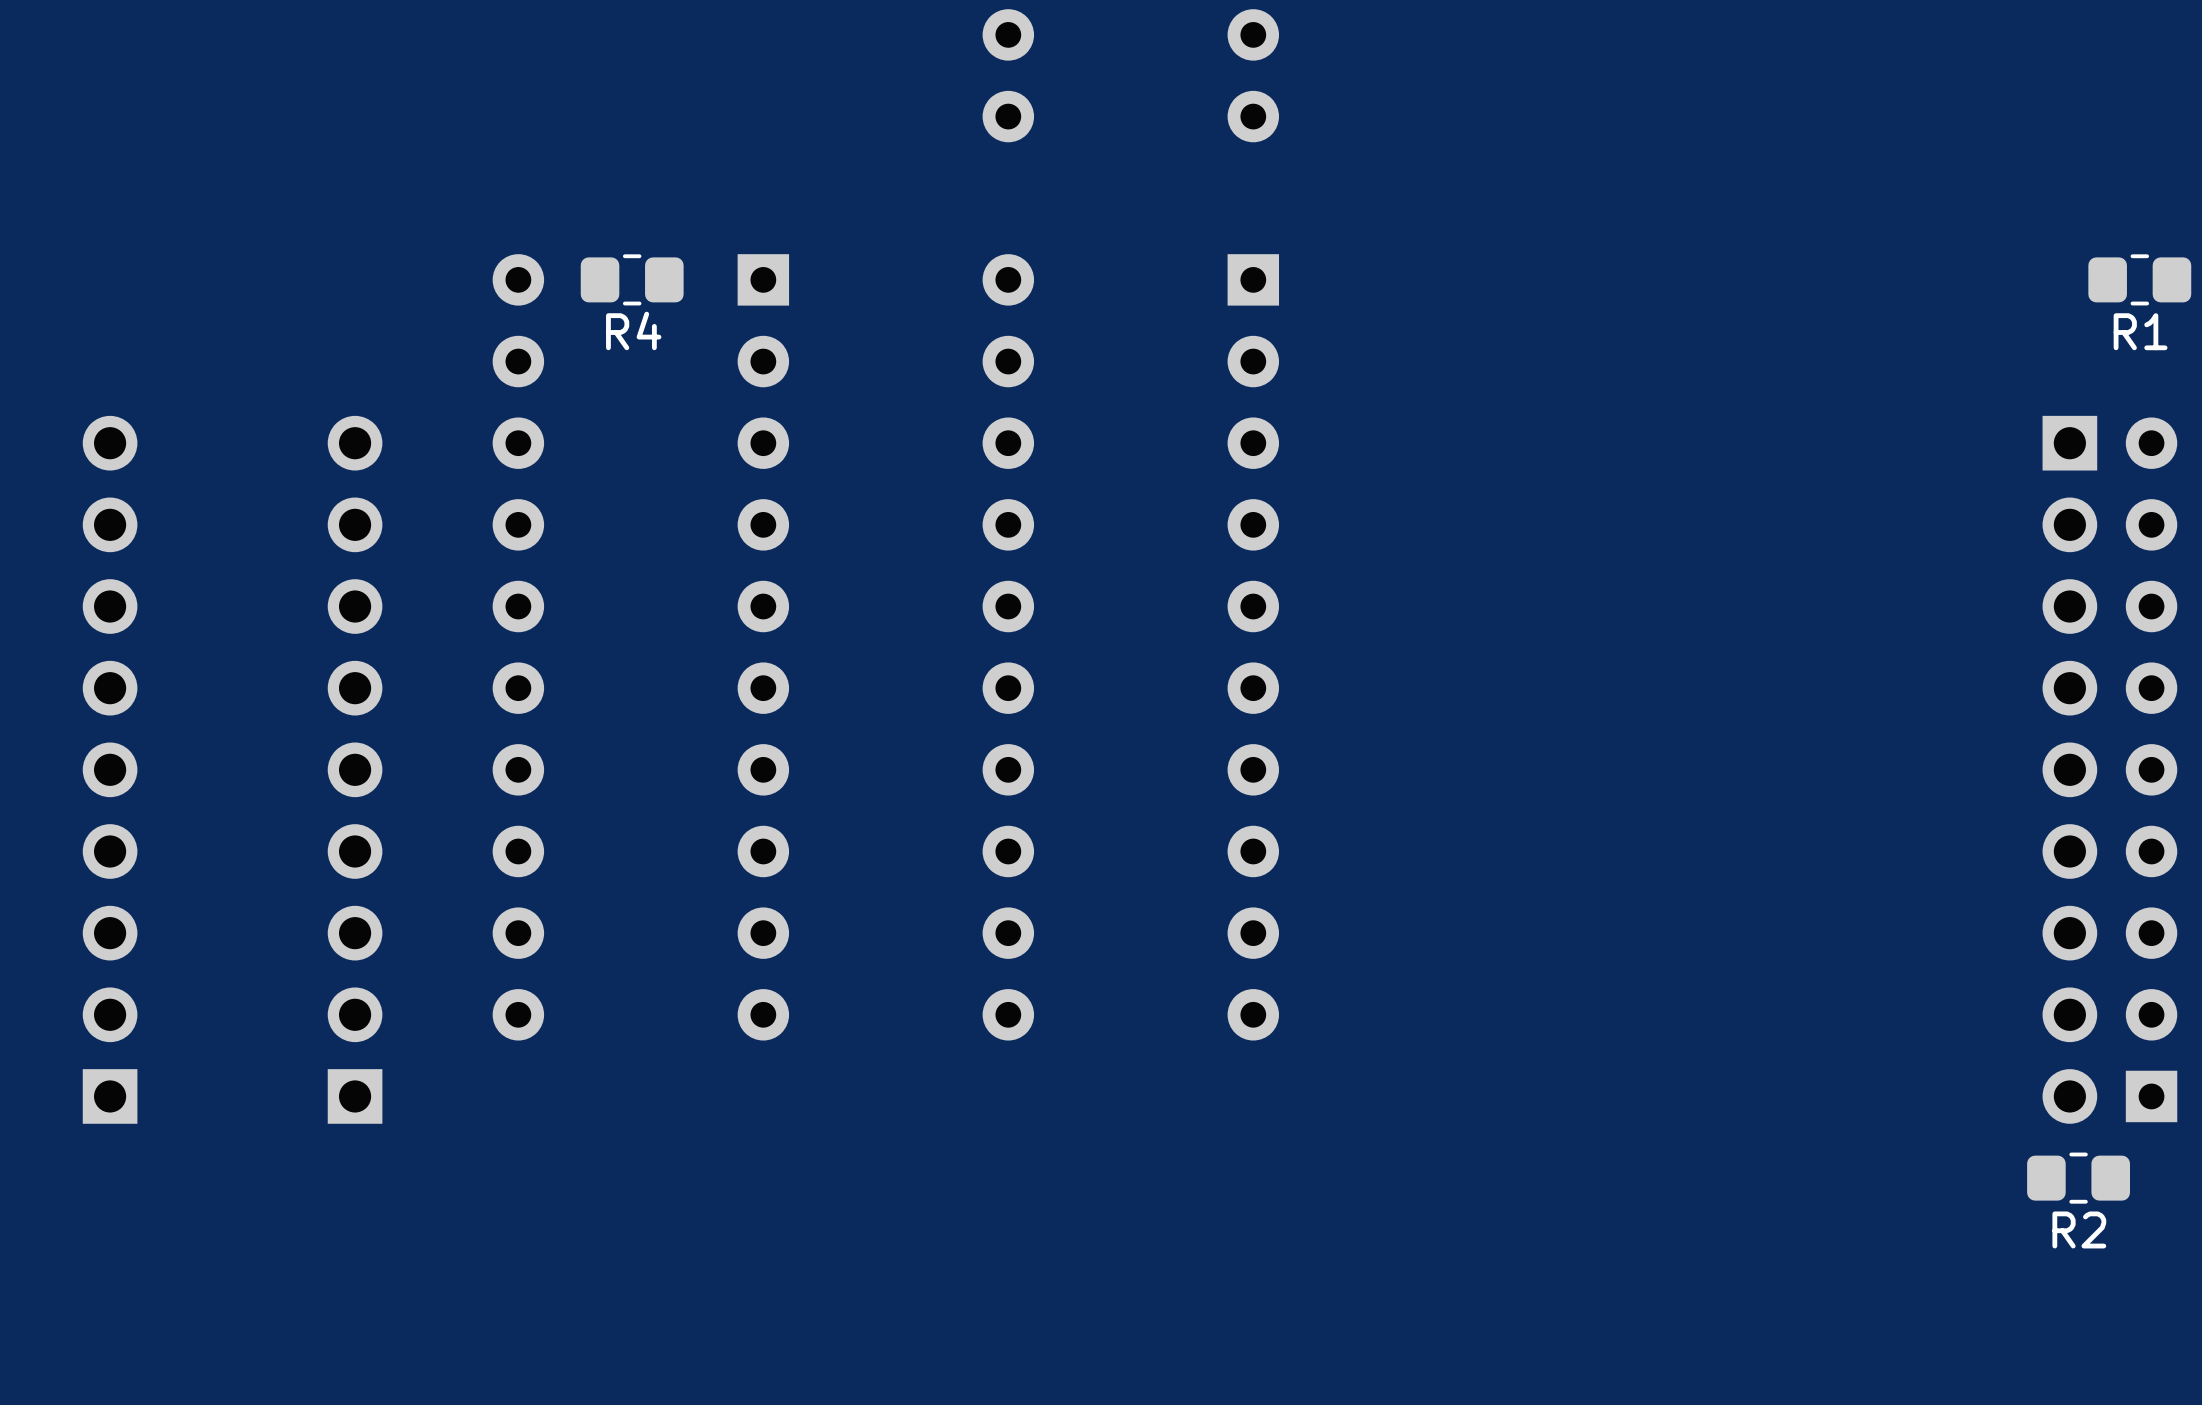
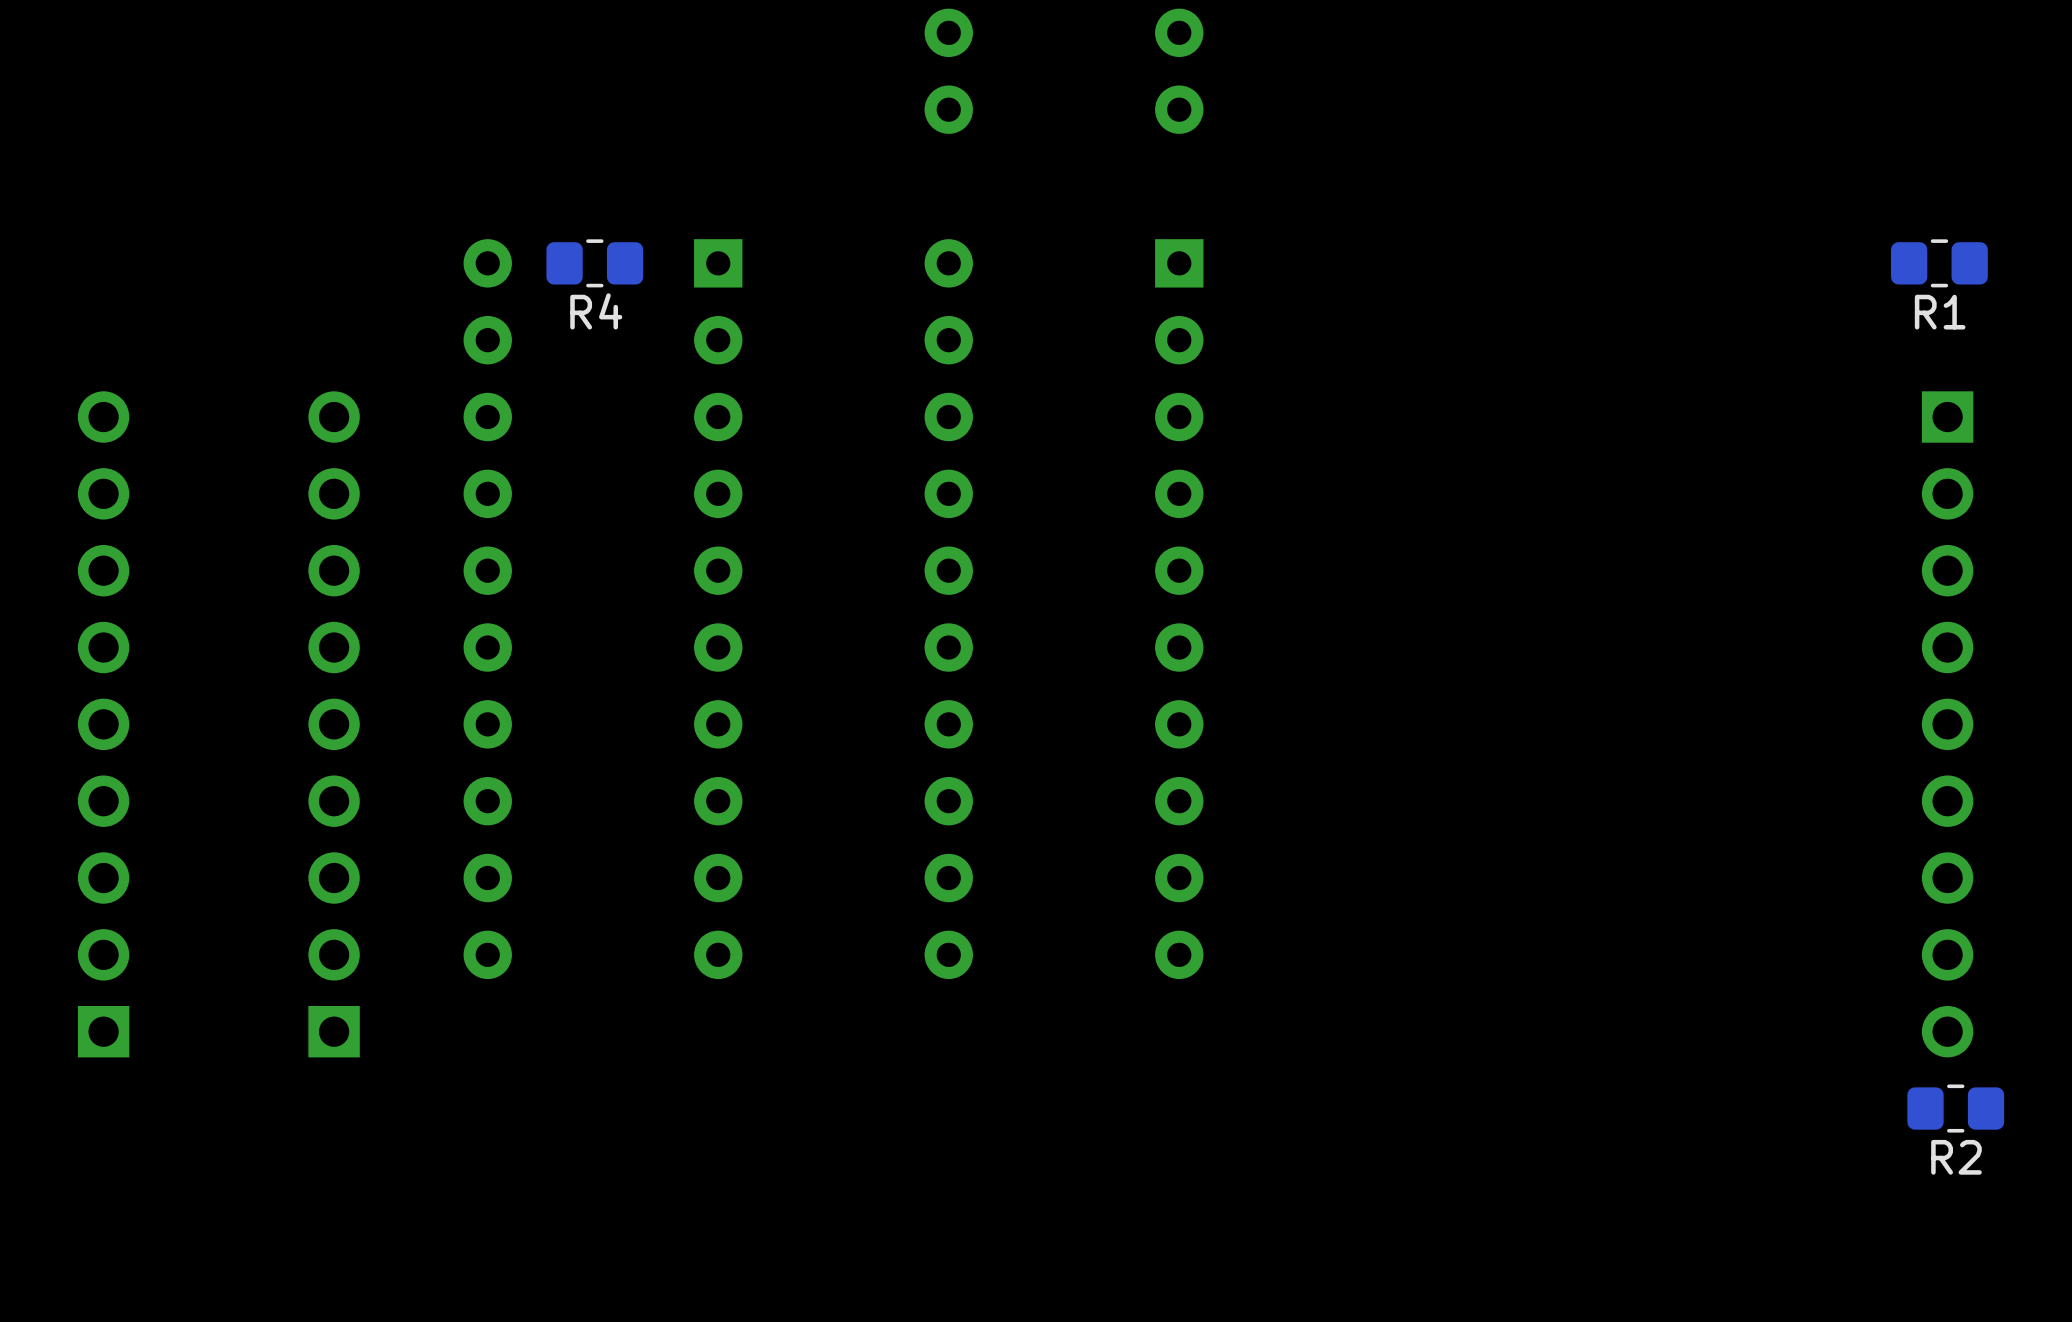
R1 position: (2139, 279) -> (1939, 263)
part: (2151, 769) -> none

